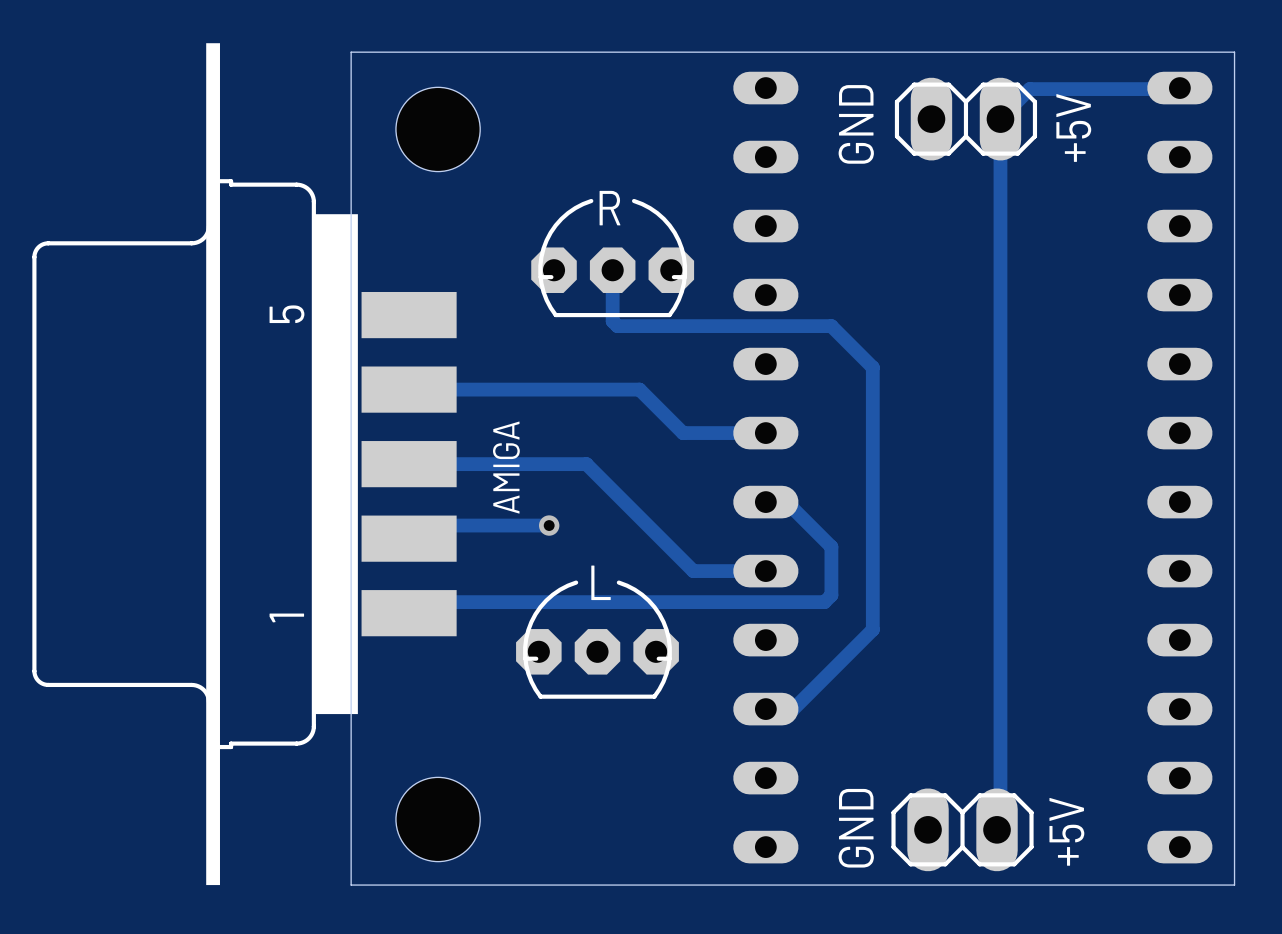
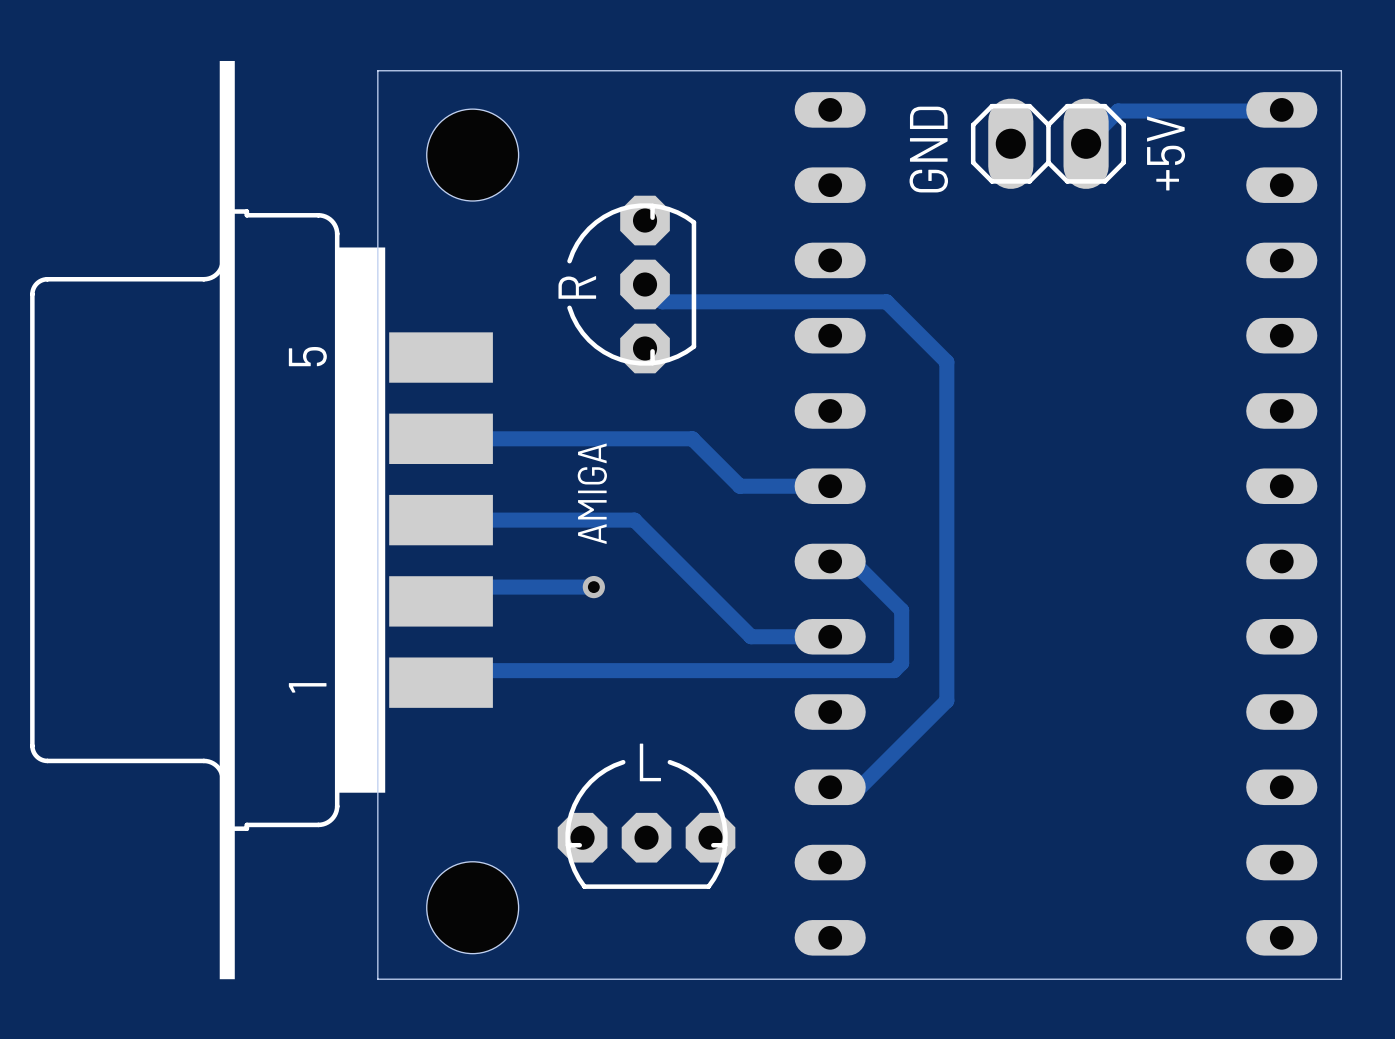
track: (1000, 119) (1000, 826) (997, 829) -> none
R rotation: 0° (612, 258) -> 90° counterclockwise (631, 284)
track: (612, 270) (612, 321) (617, 326) (831, 326) (872, 367) -> (645, 284) (662, 301) (886, 301) (946, 362) (946, 414)
AMIGA name position: AMIGA (506, 467) -> AMIGA (592, 493)
L position: (597, 639) -> (646, 824)
text: GND (856, 828) -> none
part: (962, 829) -> none
text: +5V (1066, 831) -> none

